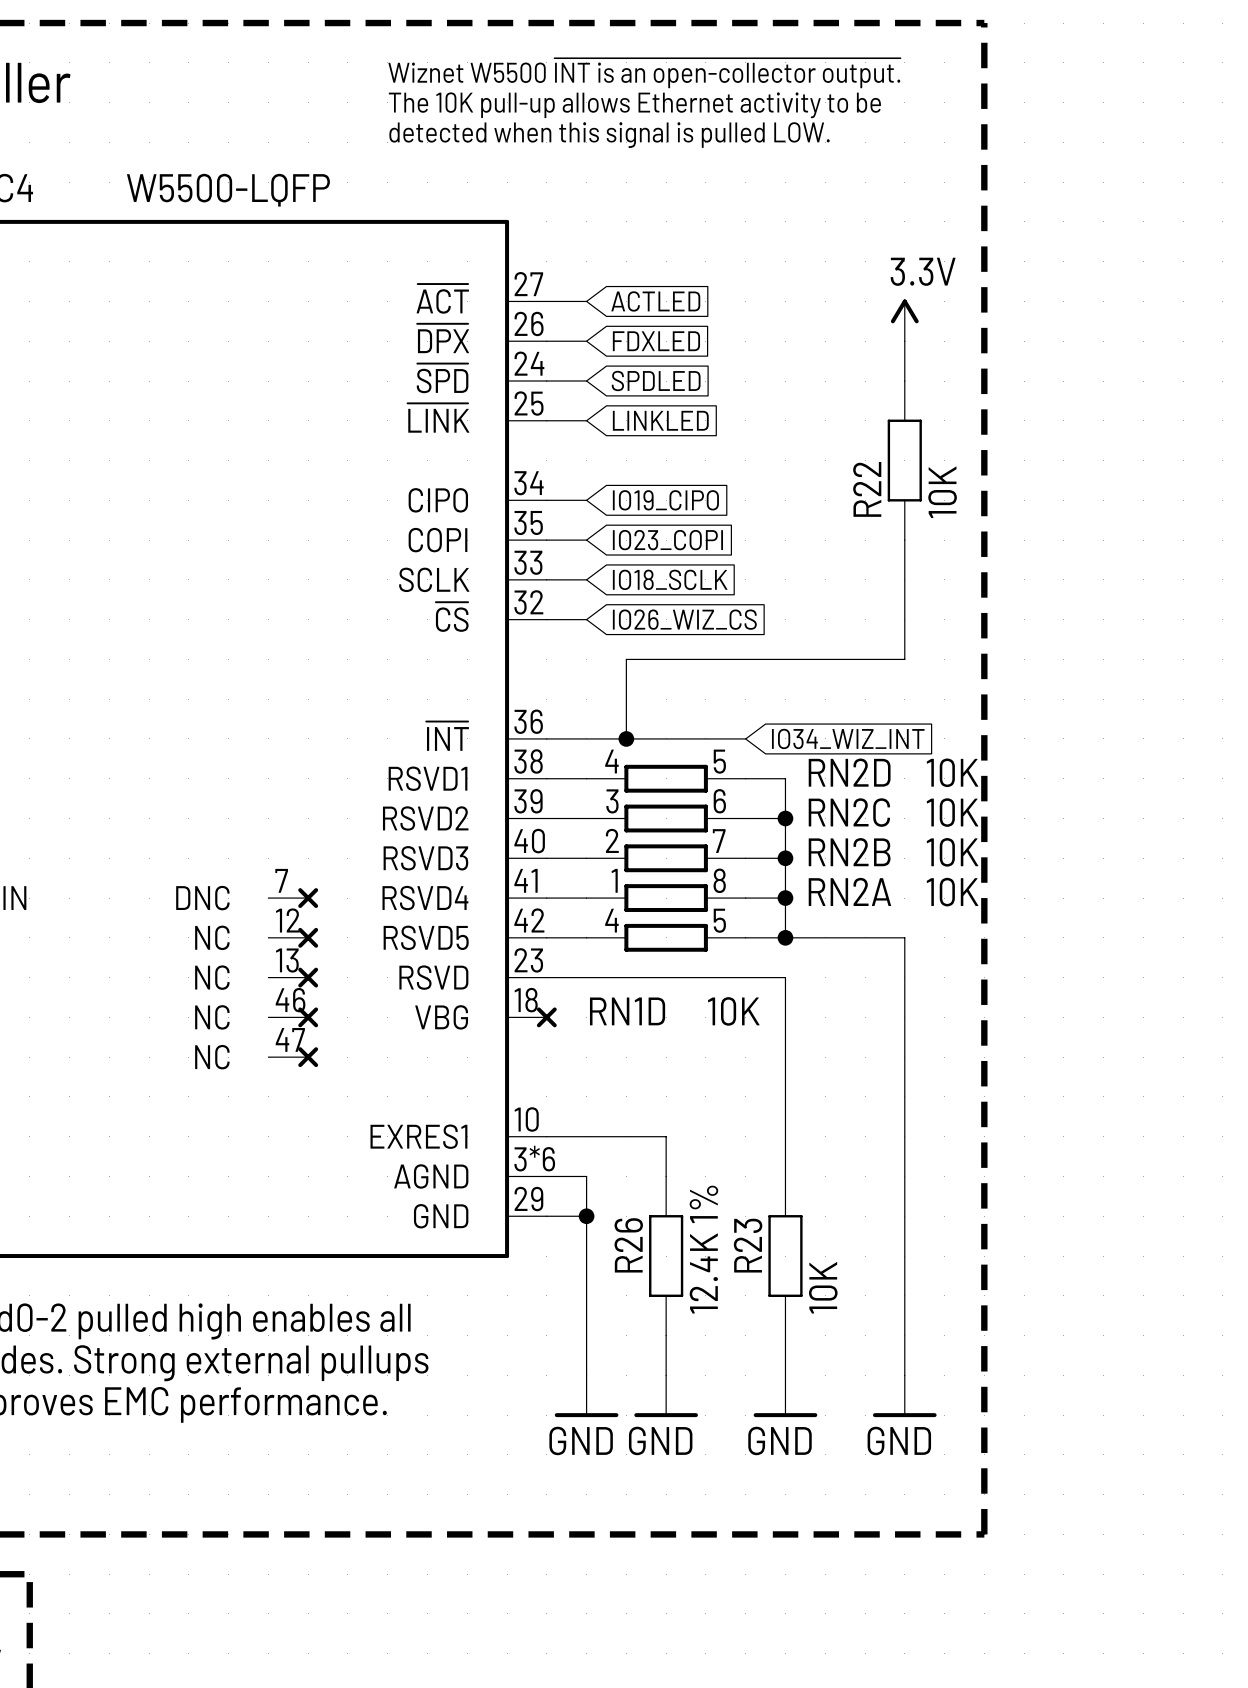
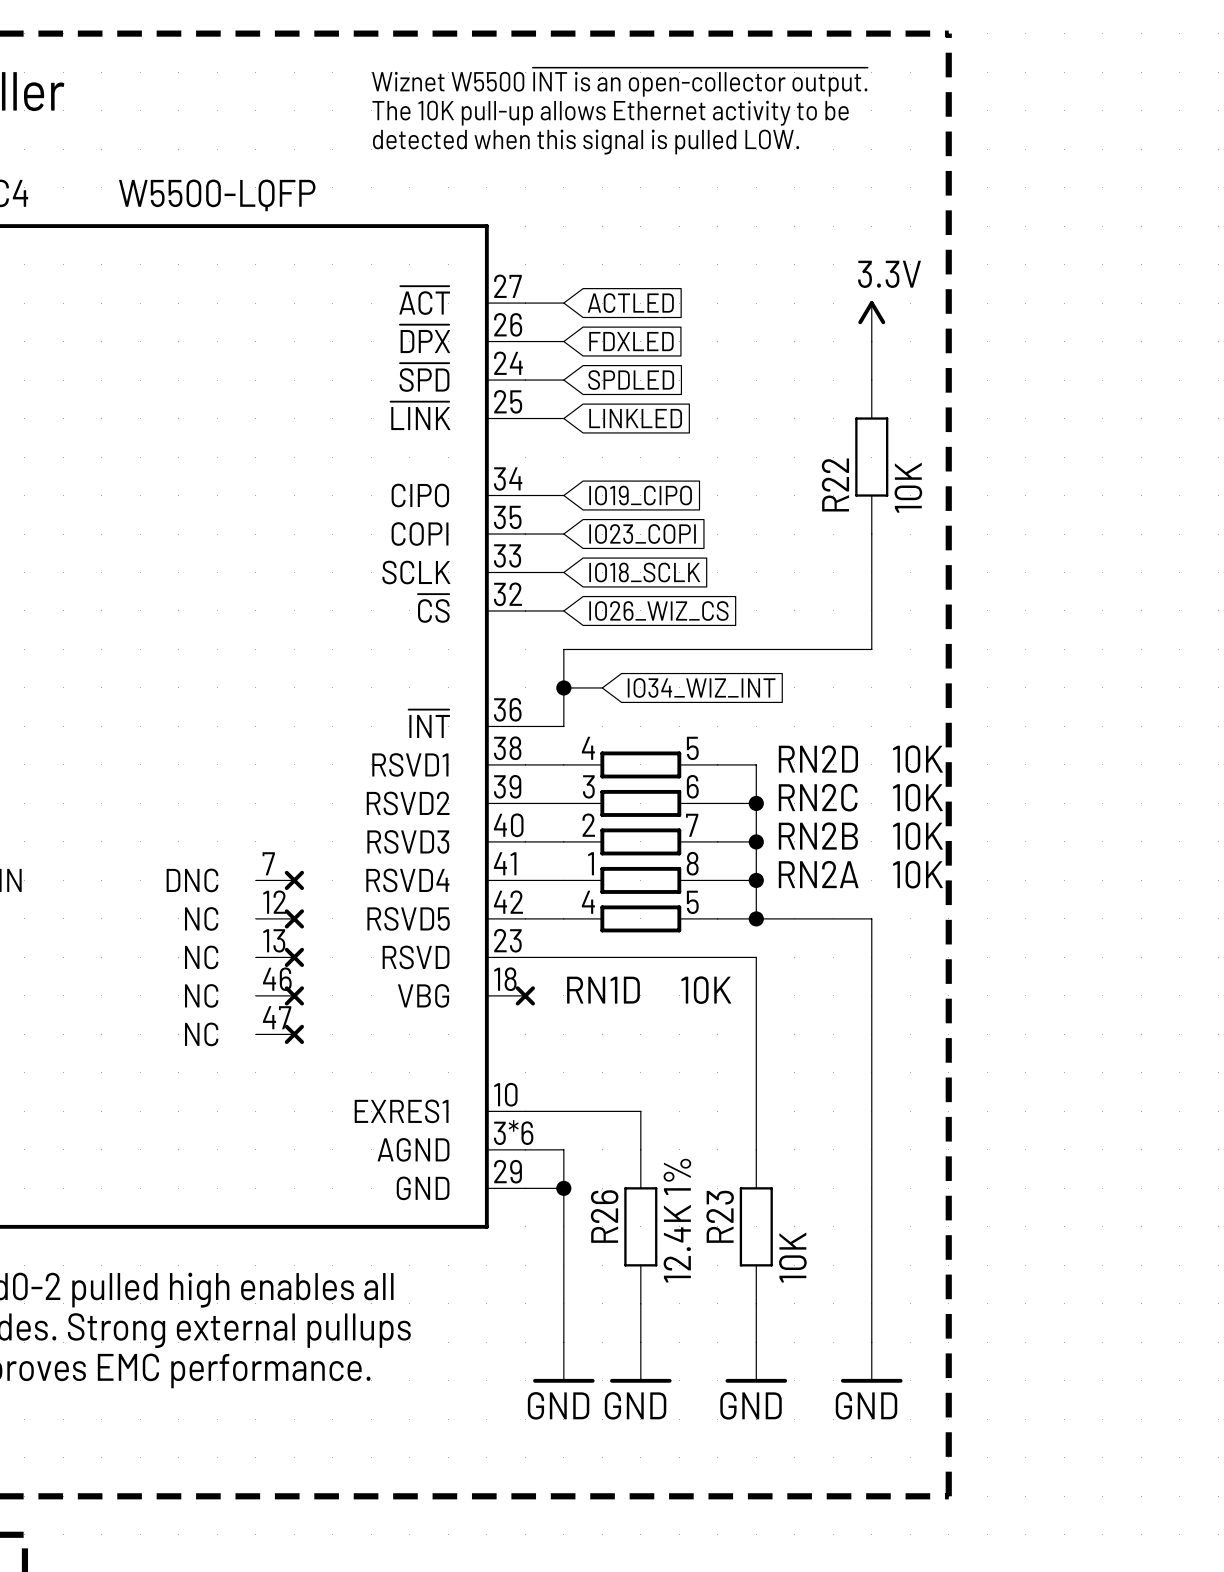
wire: (626, 659) (626, 738) -> (602, 649) (563, 649) (563, 726)
wire: none -> (563, 687) (602, 687)
wire: (586, 738) (745, 738) -> none
junction position: (626, 738) -> (563, 687)
global label position: IO34_WIZ_INT (848, 738) -> IO34_WIZ_INT (701, 687)

